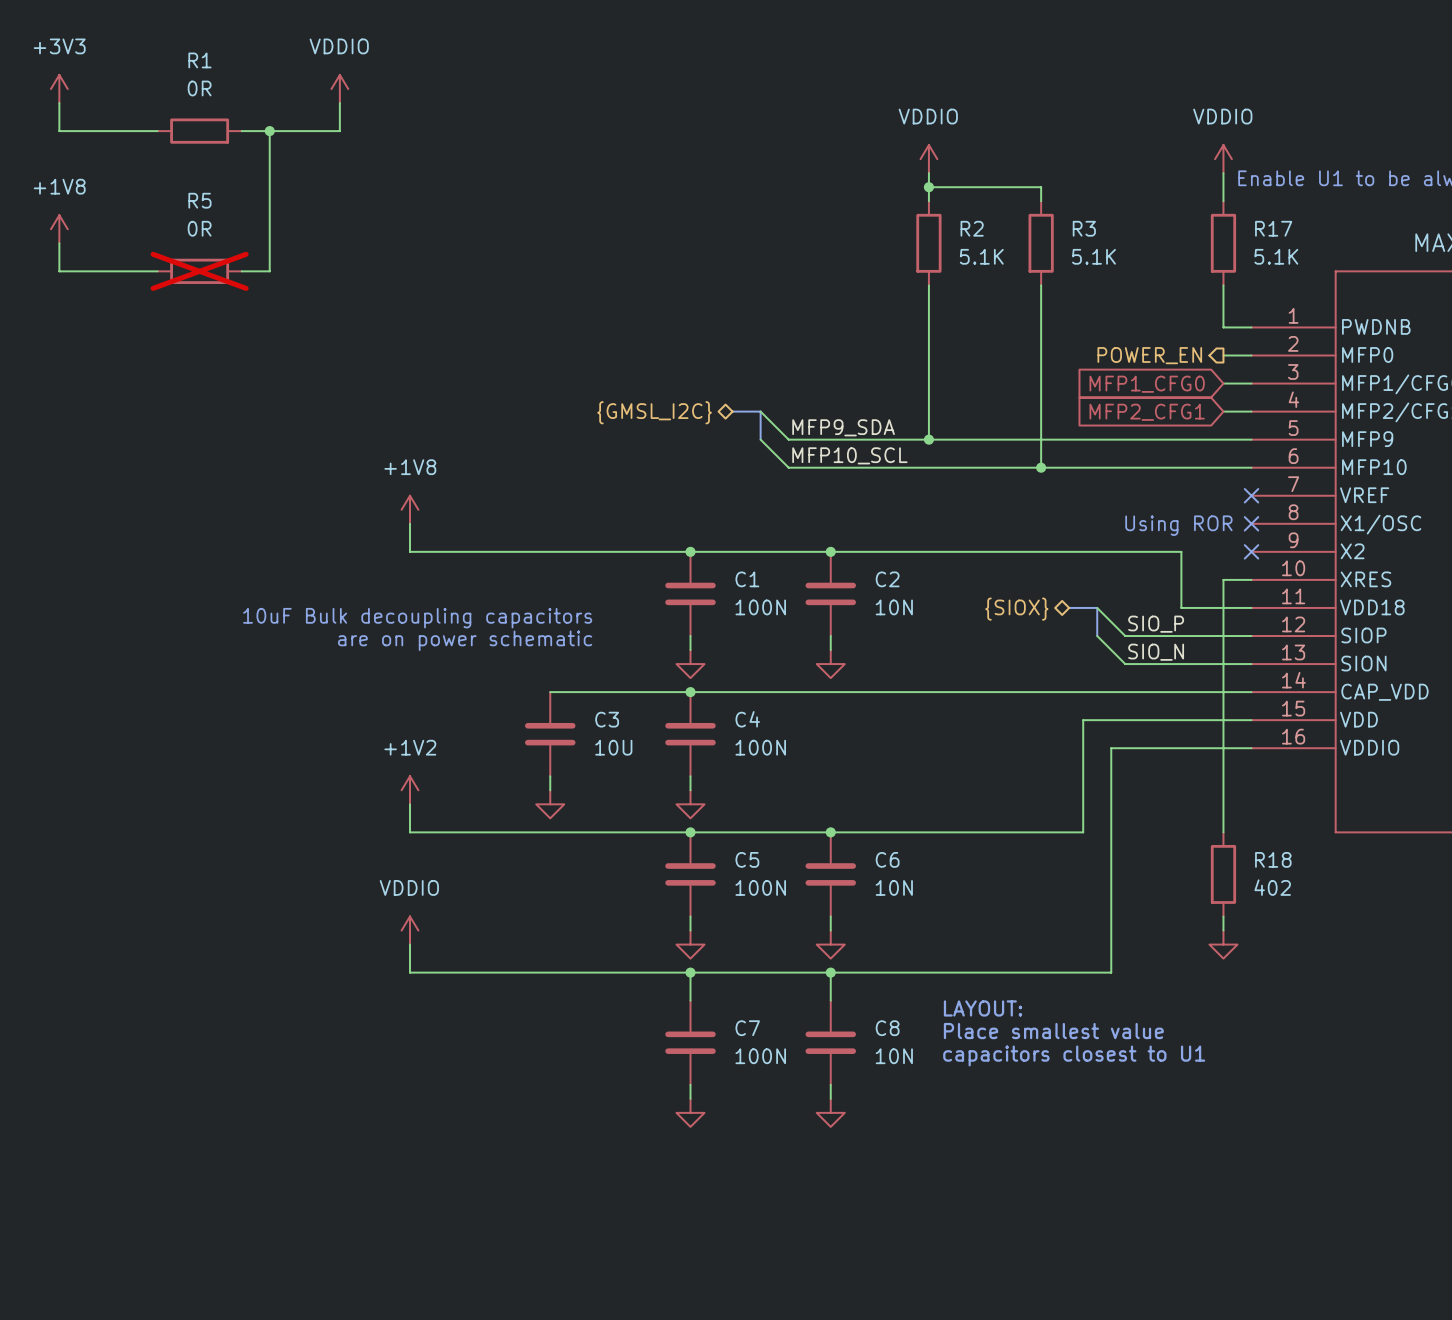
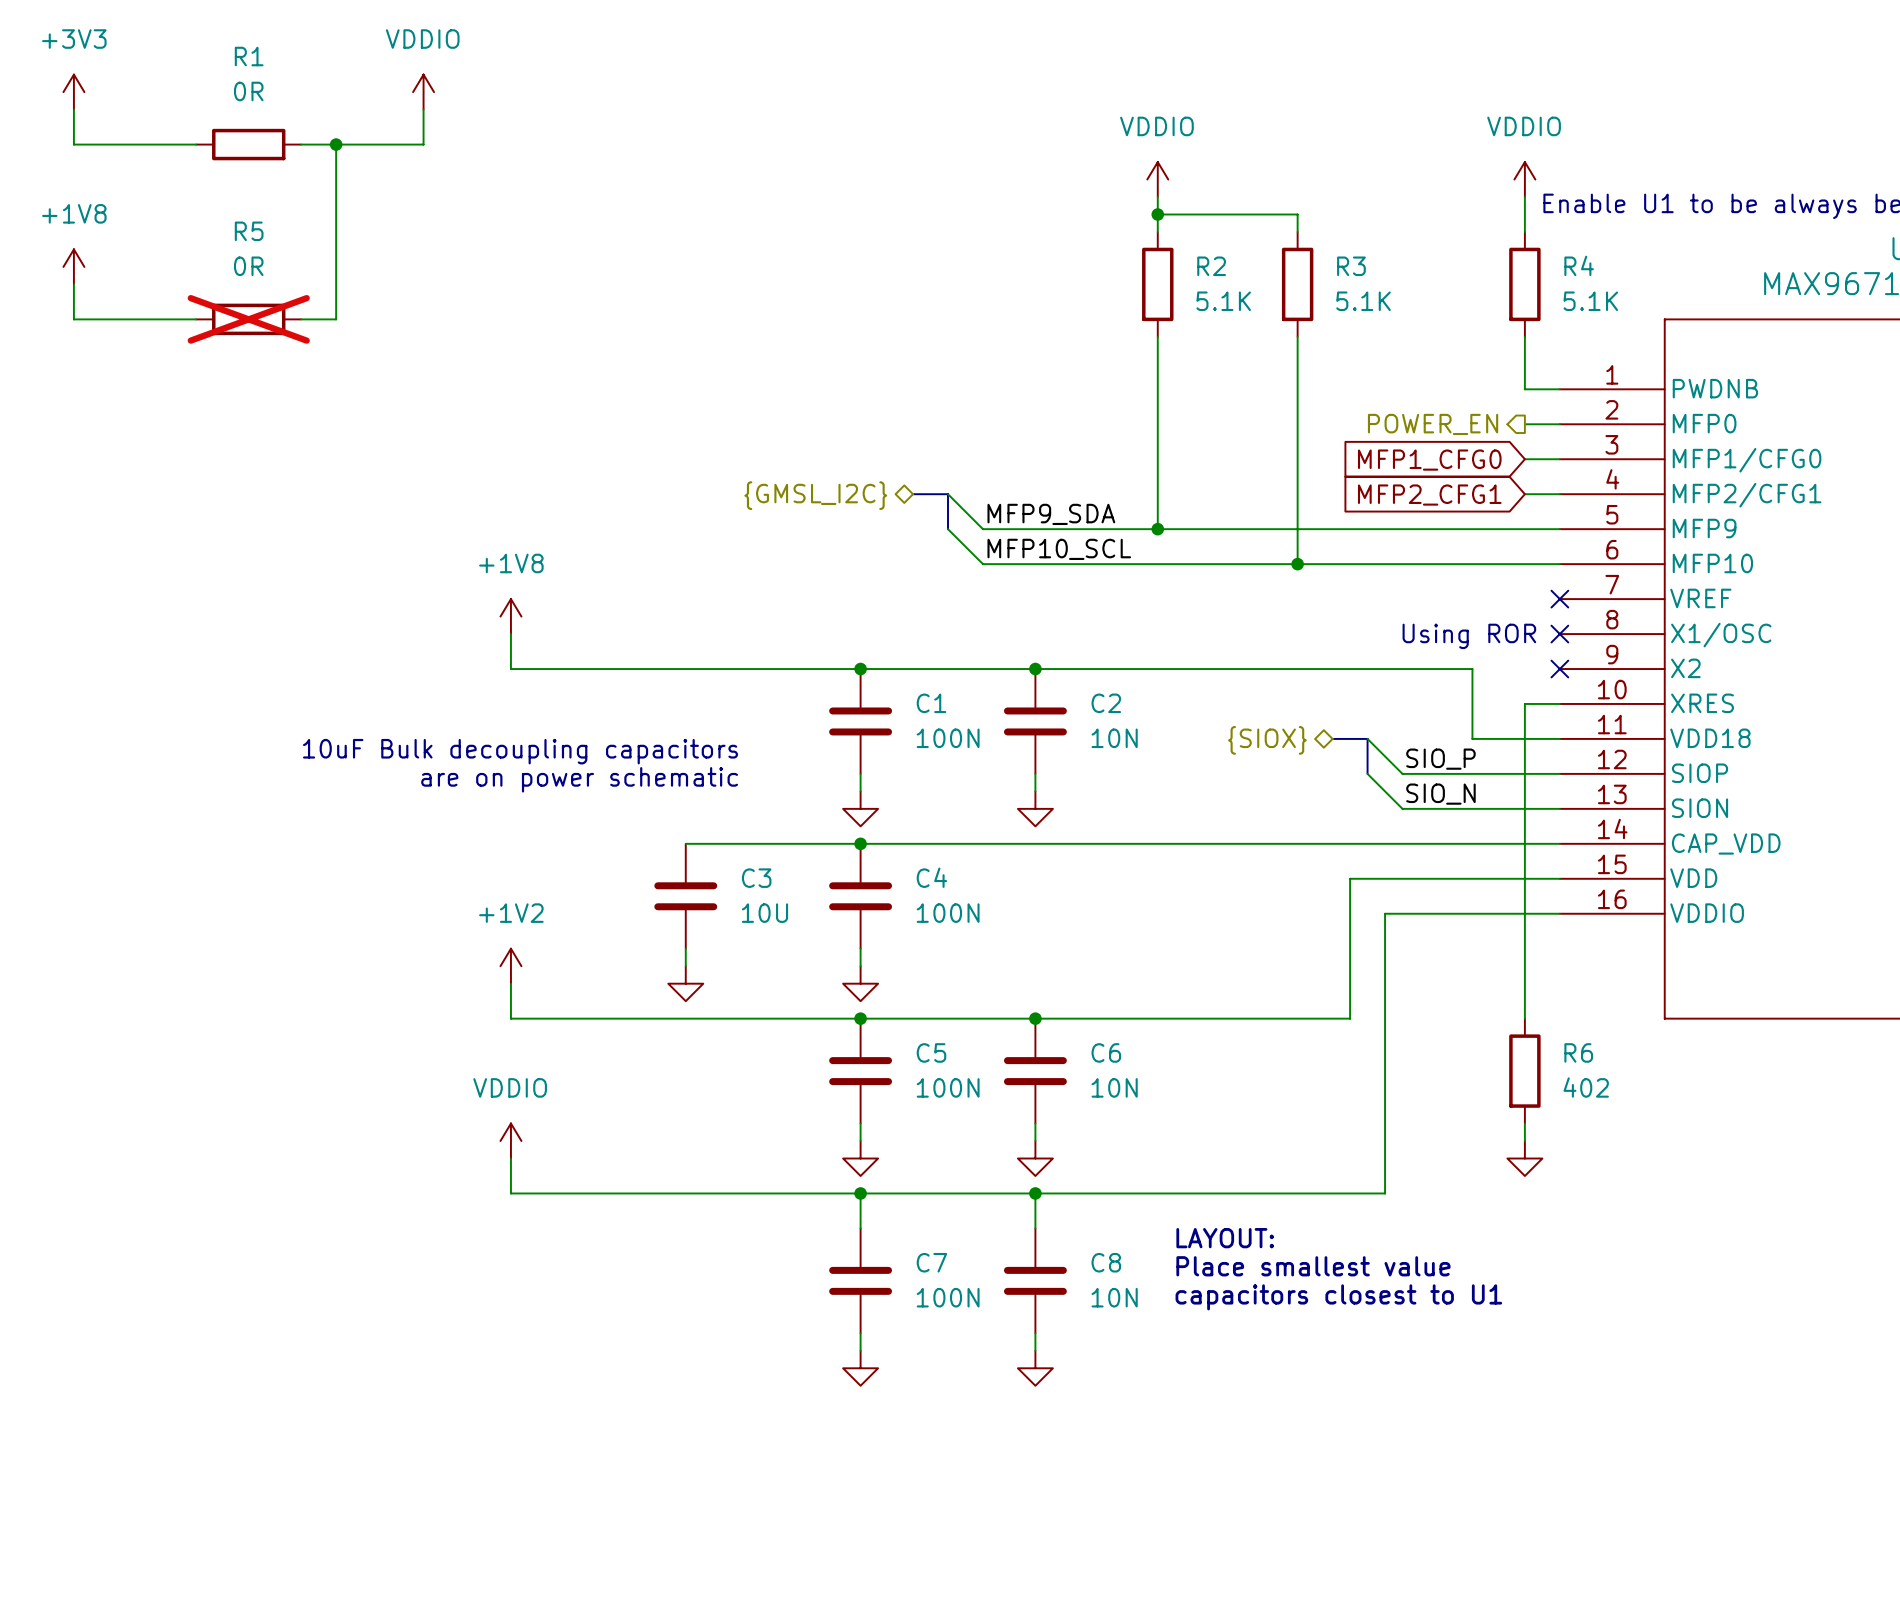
R17 name: R17 (1273, 228) -> R4 (1579, 265)
R18 name: R18 (1273, 859) -> R6 (1578, 1052)

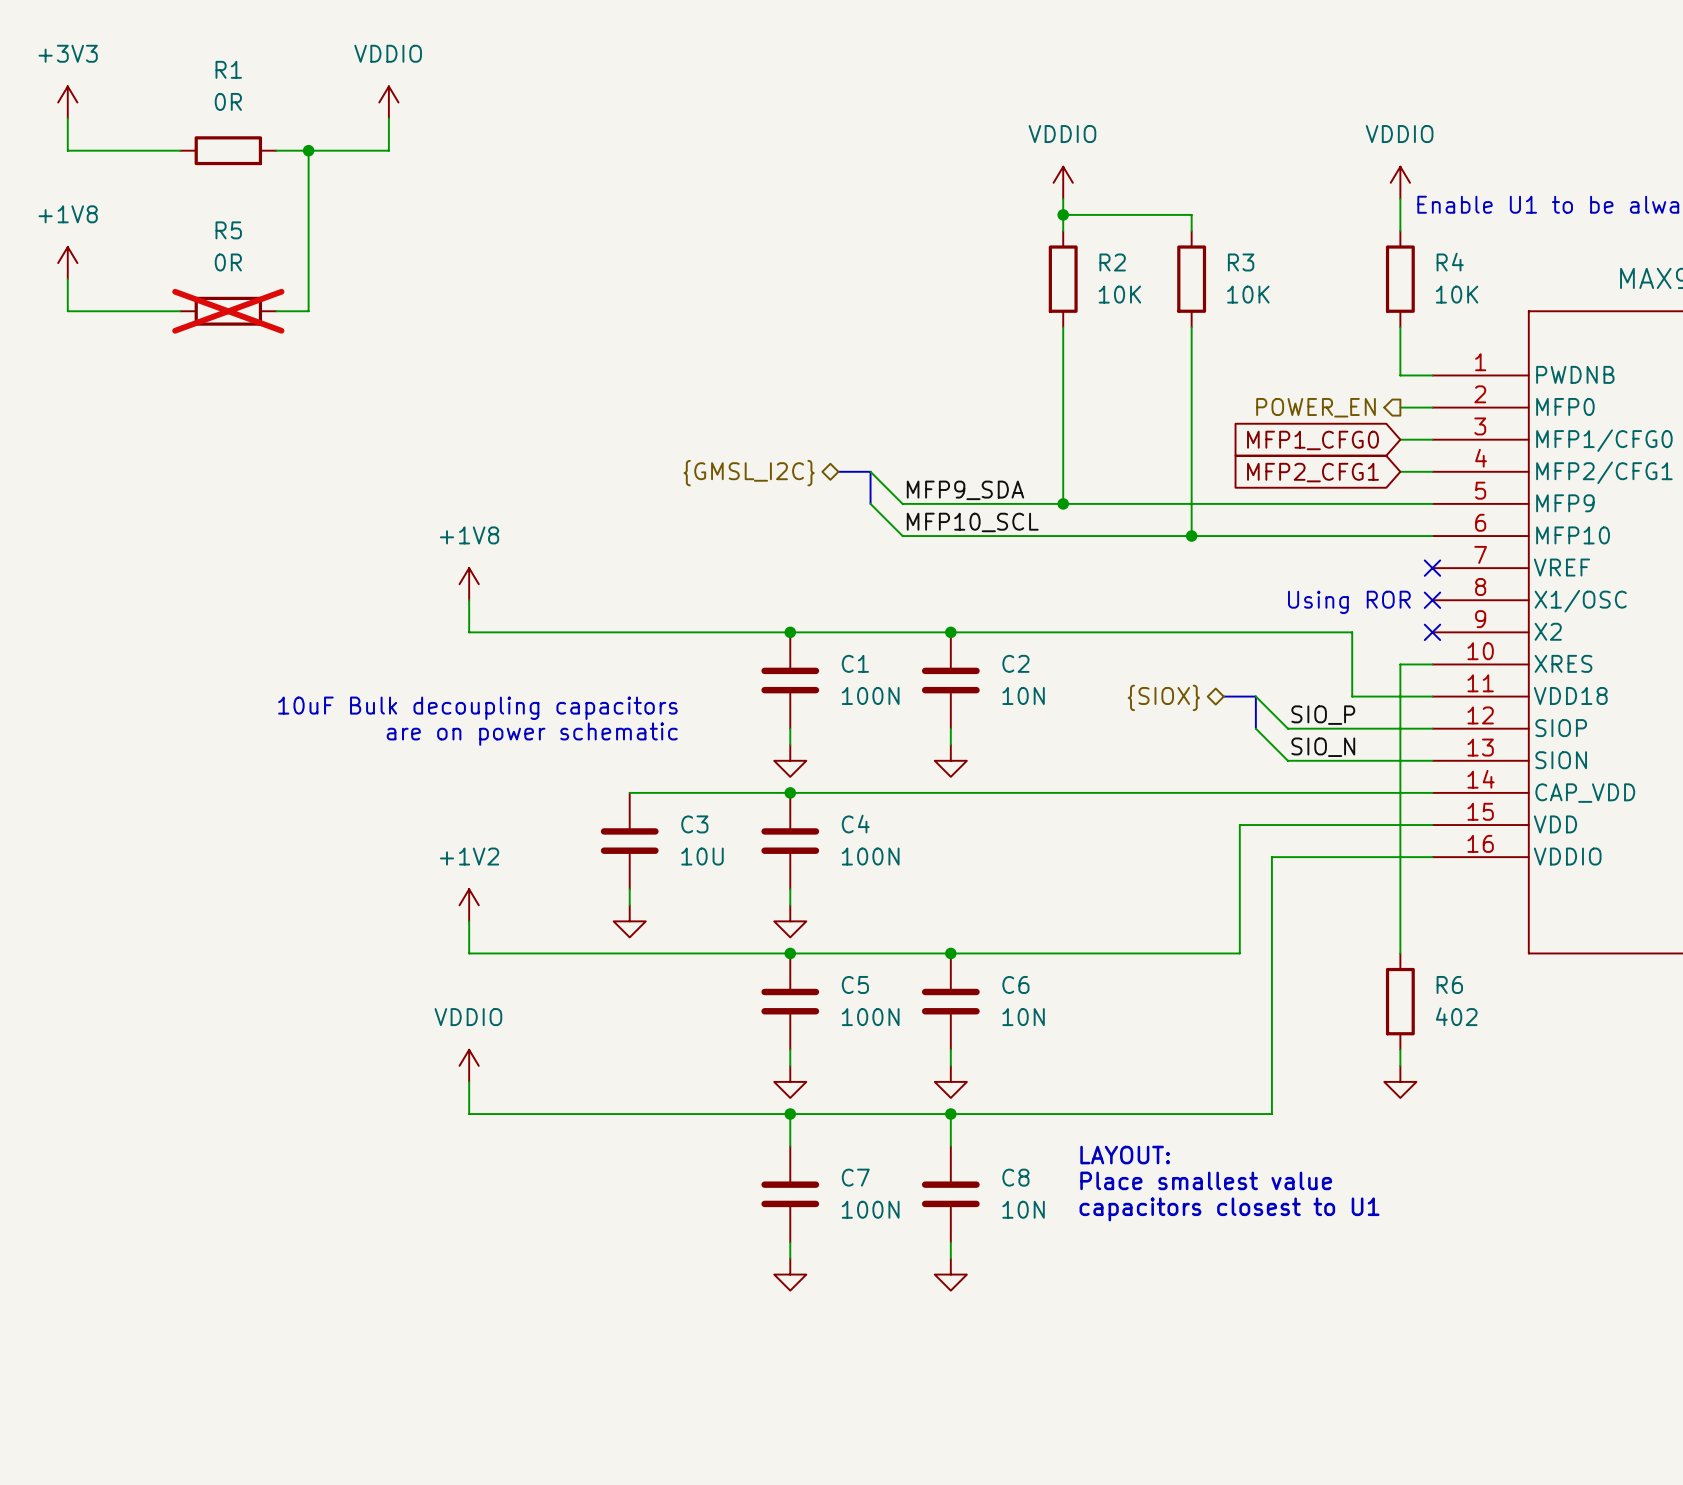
R2 value: 5.1K (1223, 301) -> 10K (1119, 294)
R3 value: 5.1K (1363, 301) -> 10K (1248, 294)
R4 value: 5.1K (1590, 301) -> 10K (1457, 294)

